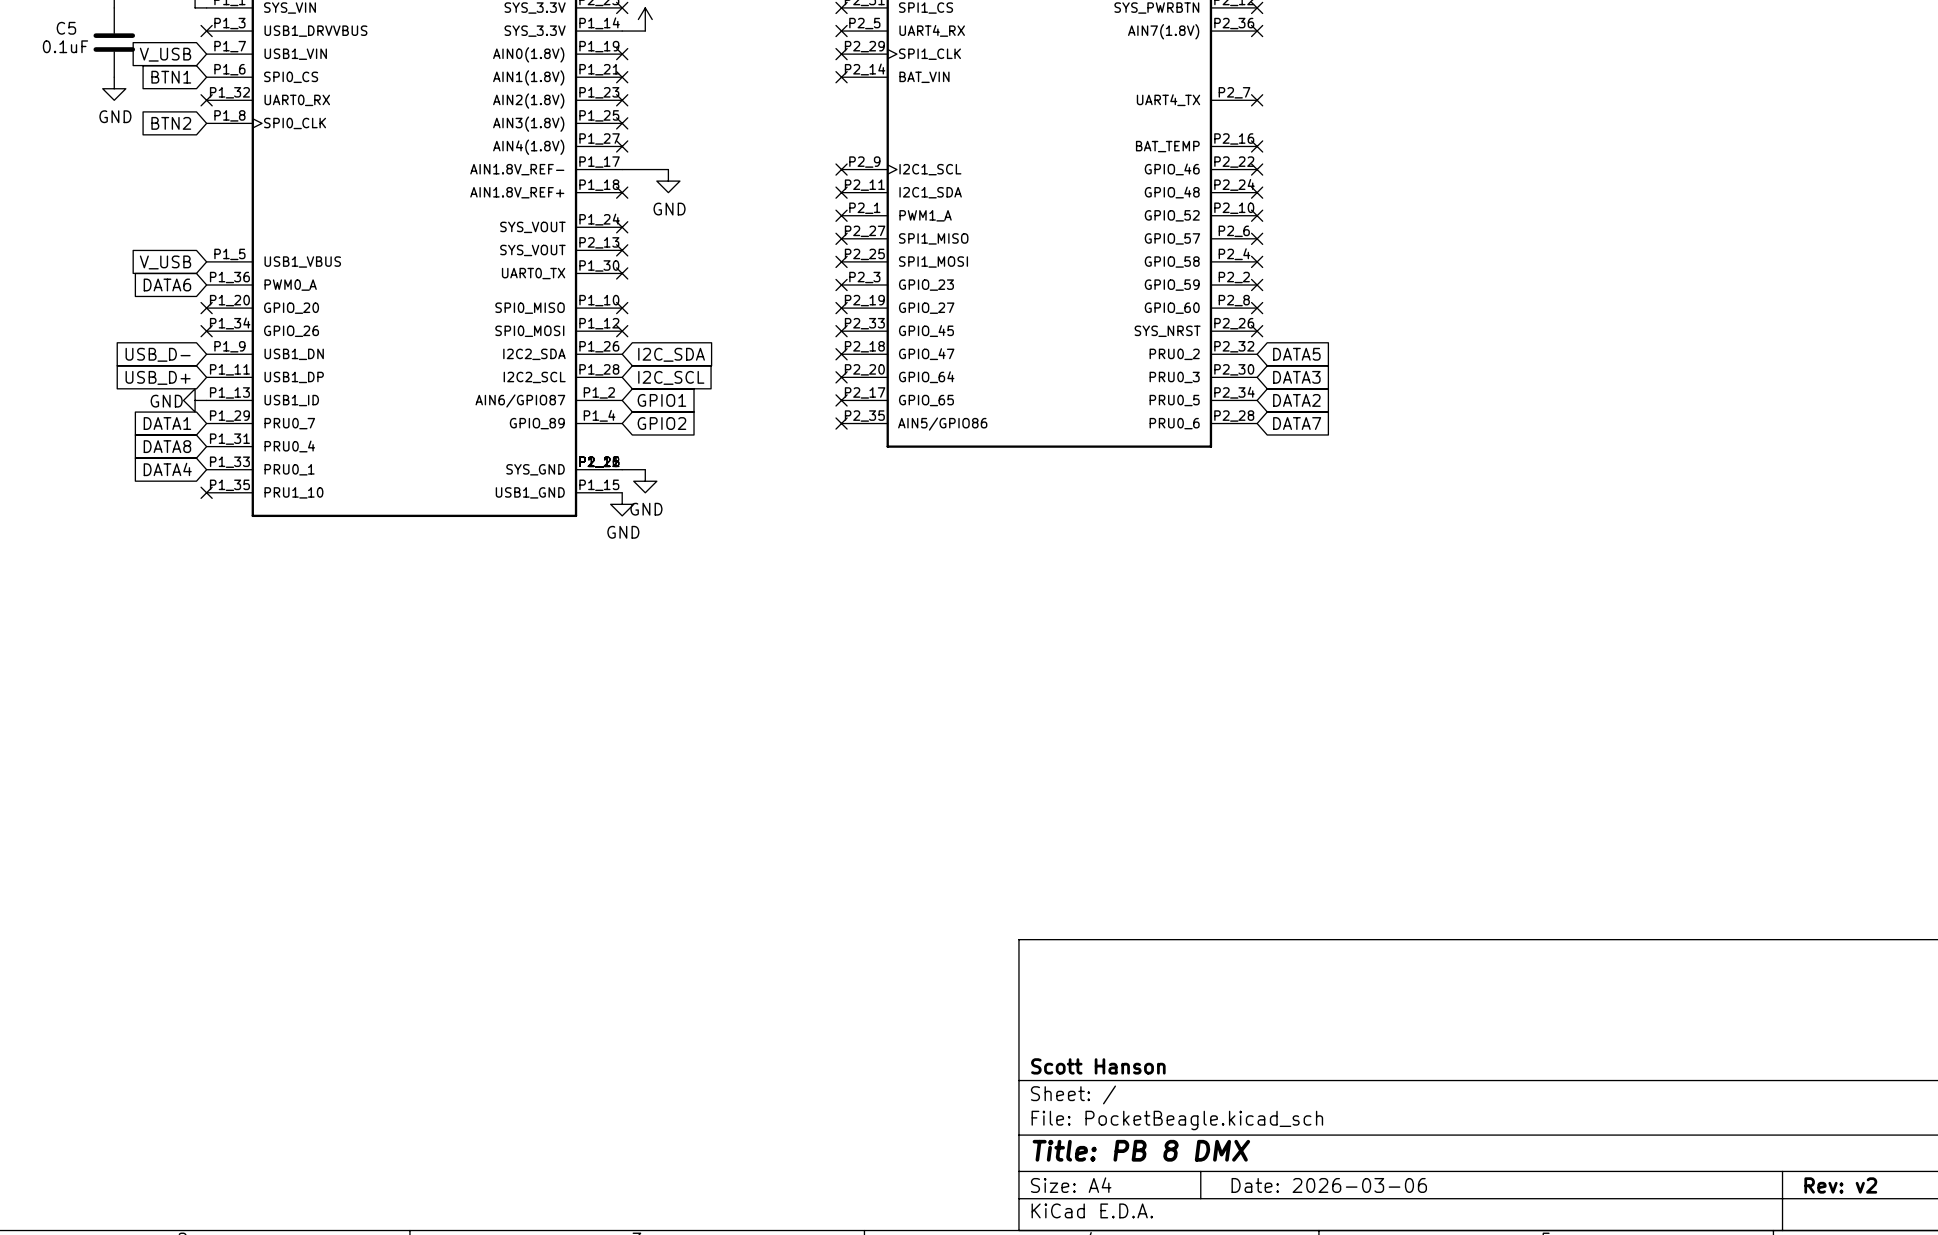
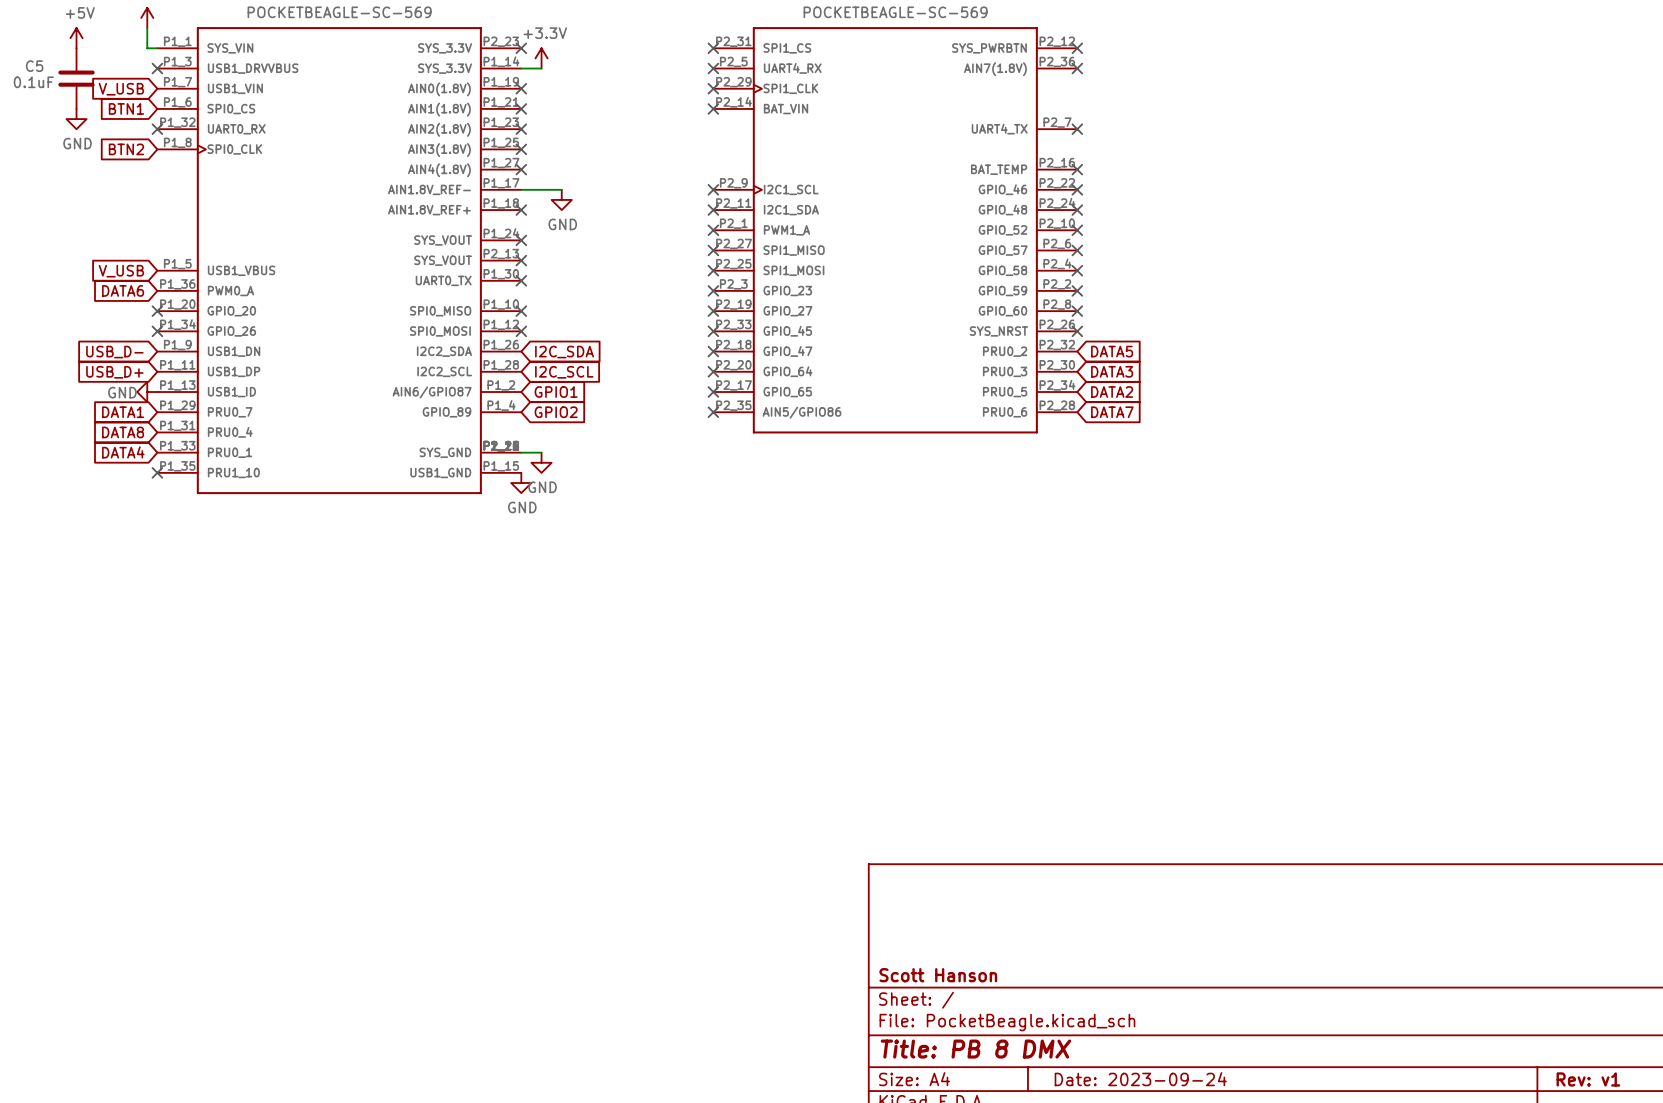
title block: Date: 2026-03-06 (1329, 1185) -> Date: 2023-09-24 (1140, 1079)
title block: Rev: v2 (1840, 1185) -> Rev: v1 (1588, 1079)

